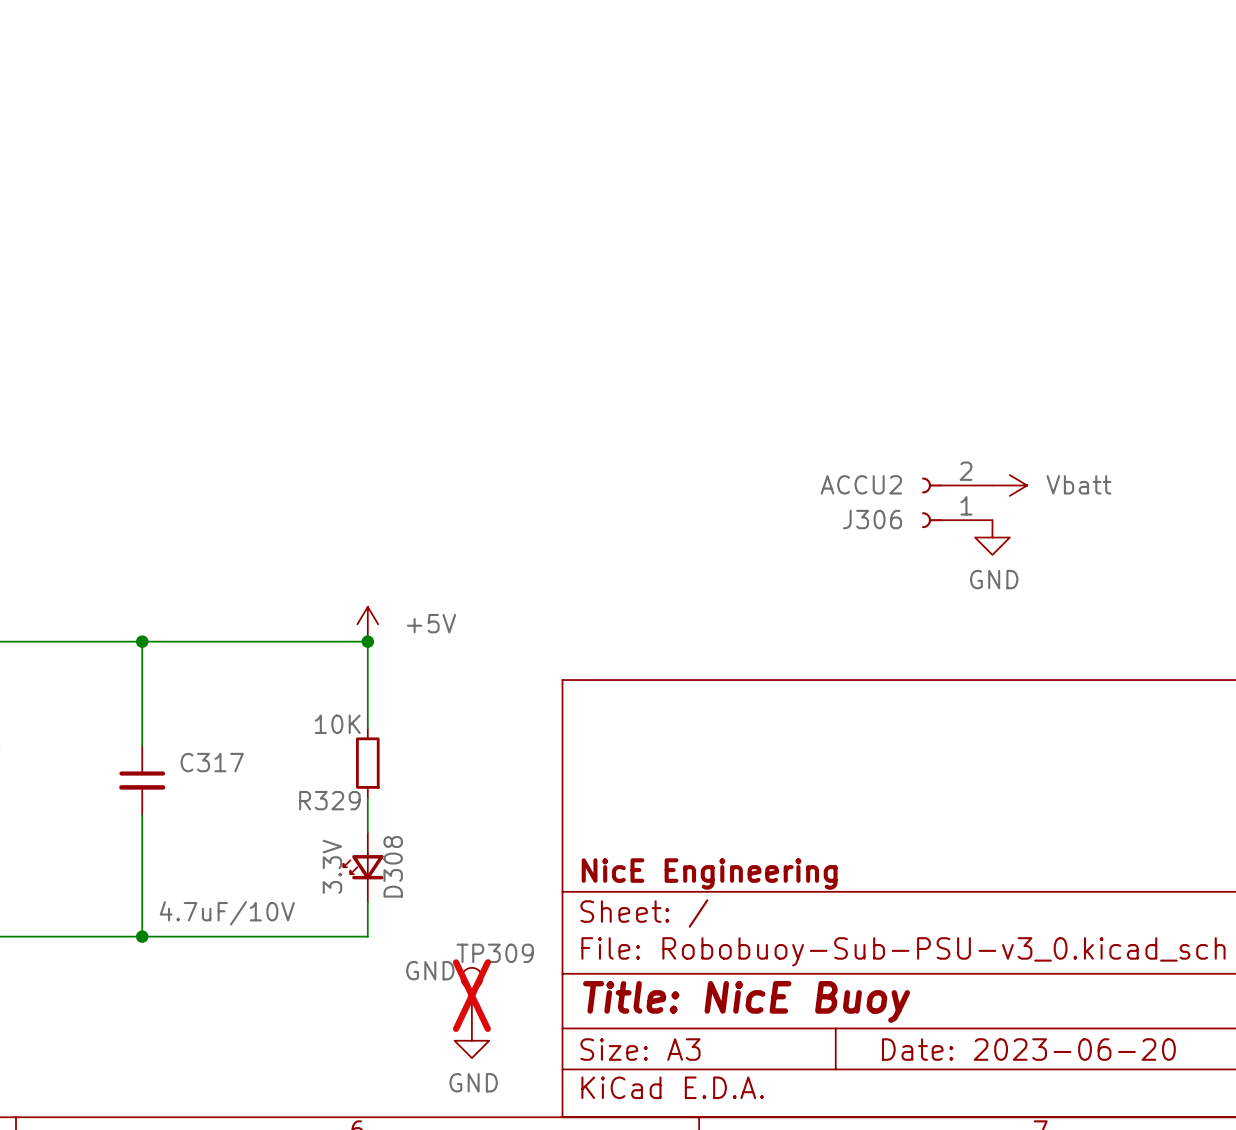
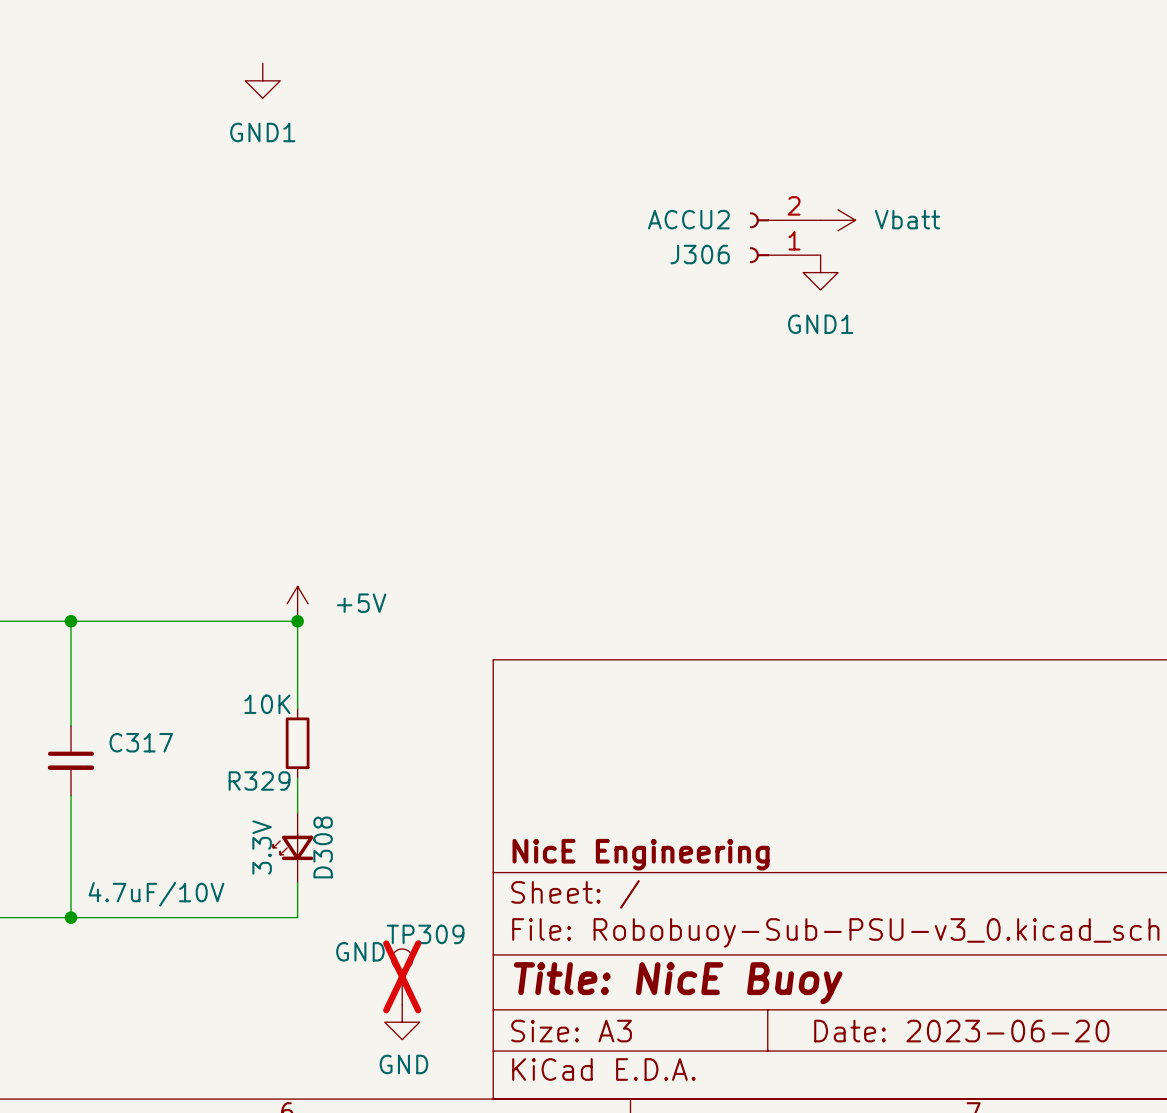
power symbol: none -> GND1 (262, 80)
power symbol: none -> GND1 (820, 272)
power symbol position: Vbatt (1009, 485) -> Vbatt (838, 220)
J306 position: (957, 502) -> (785, 237)
power symbol: GND (992, 537) -> none

